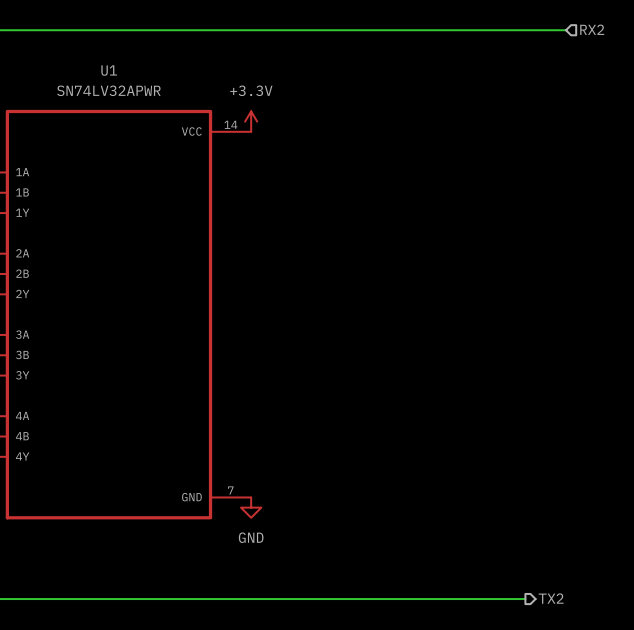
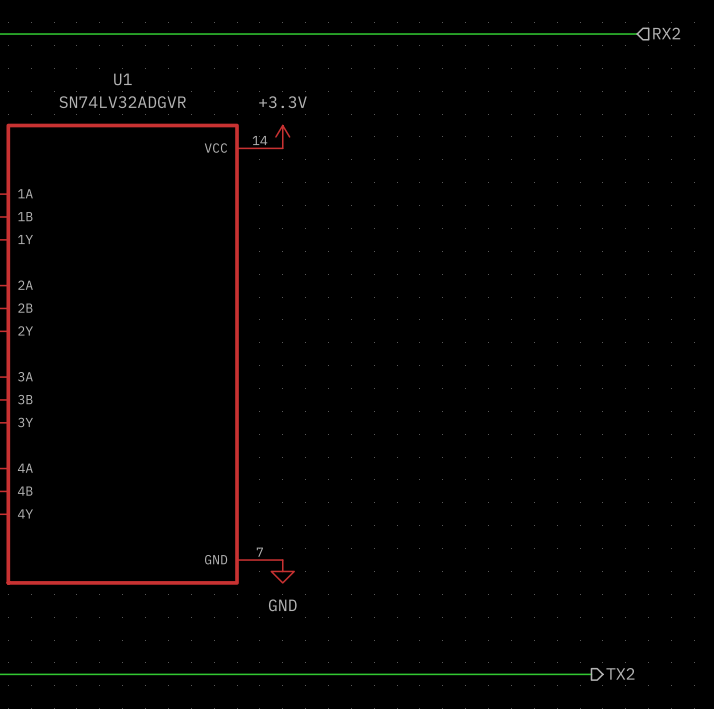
U1 value: SN74LV32APWR (108, 90) -> SN74LV32ADGVR (122, 102)

